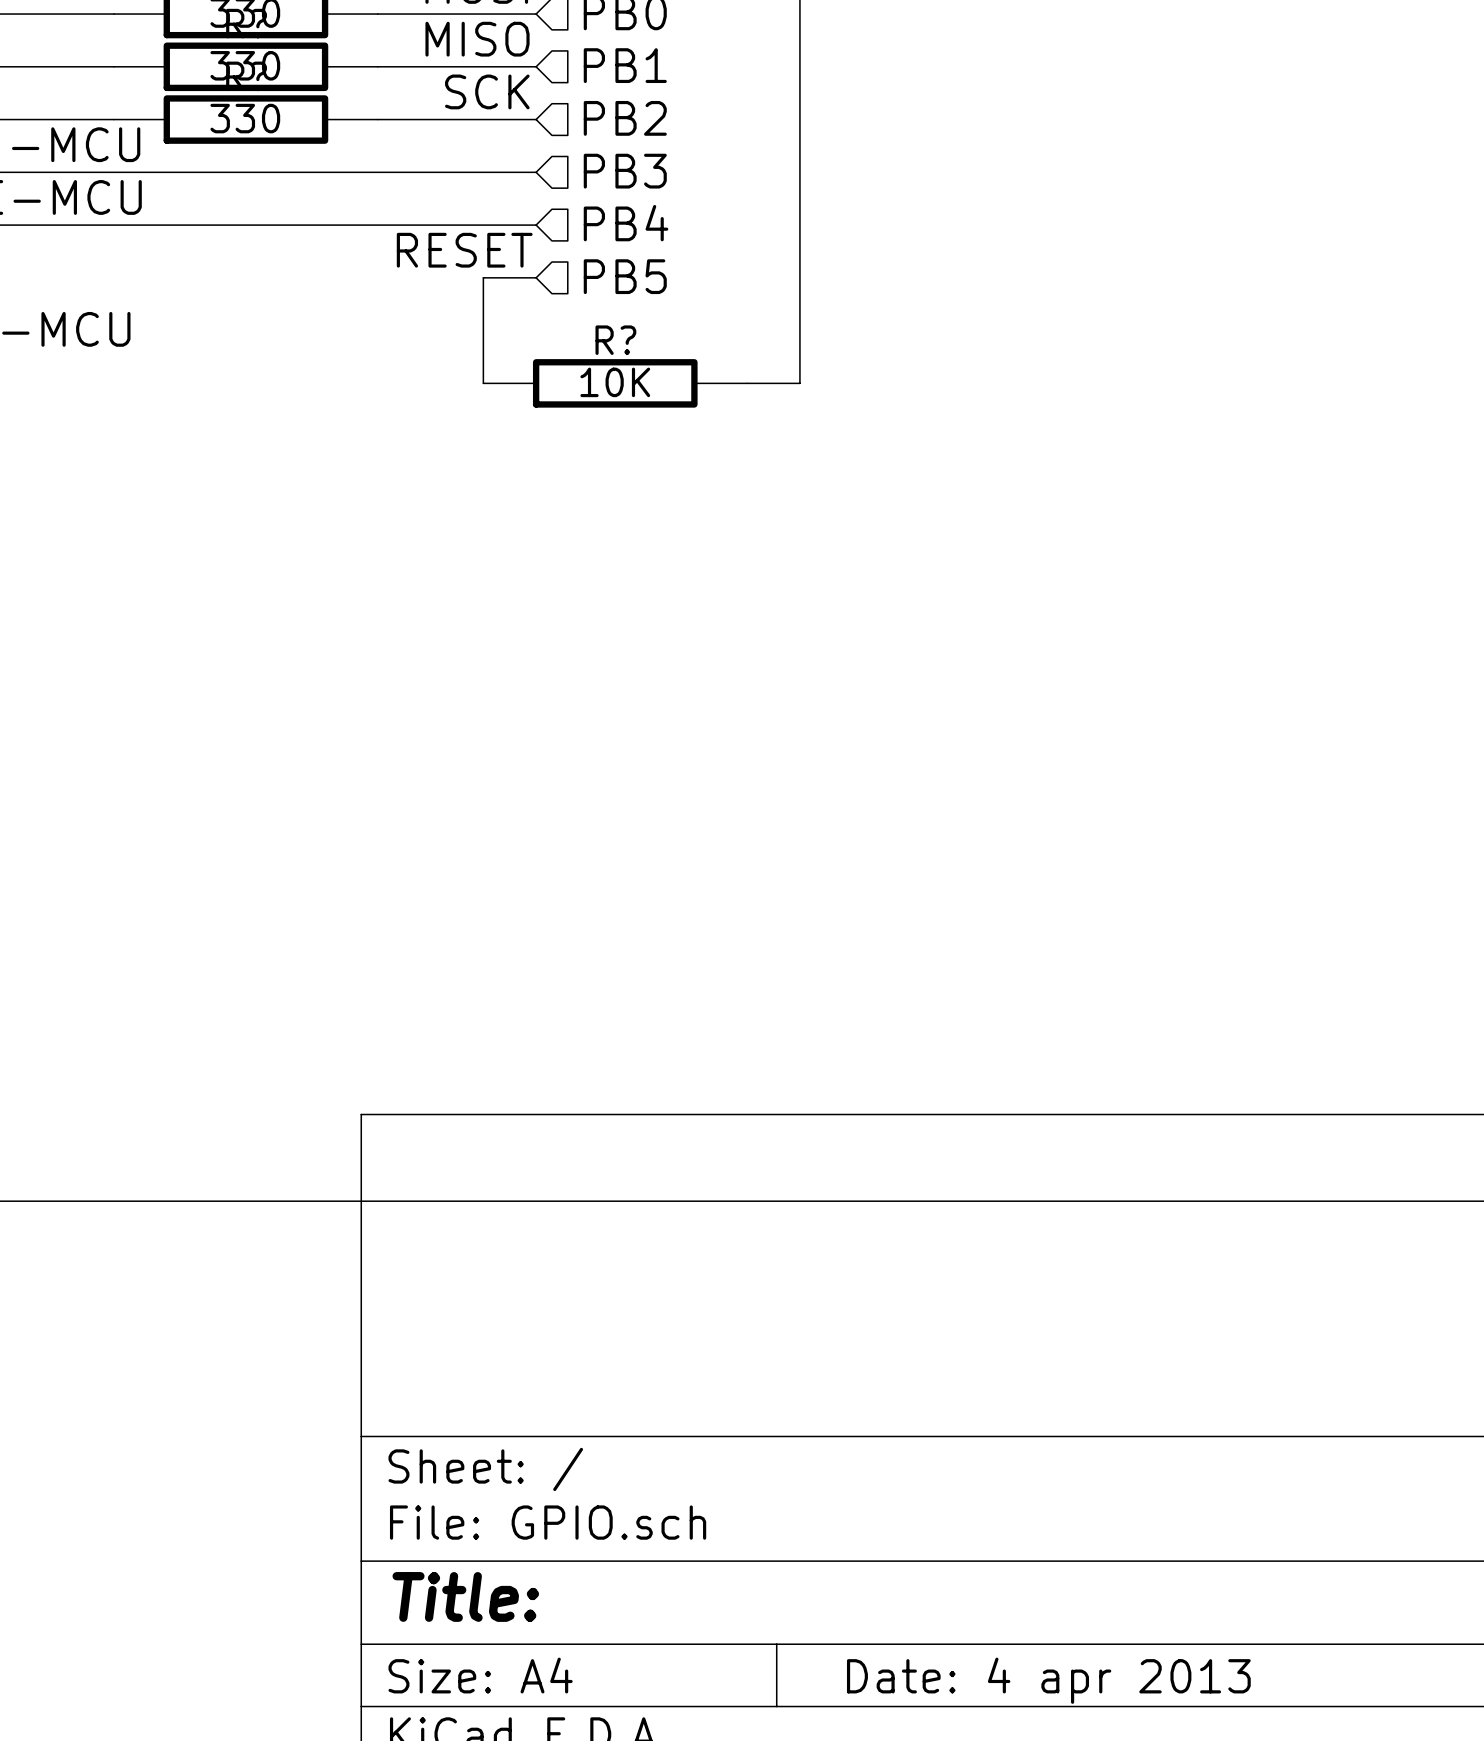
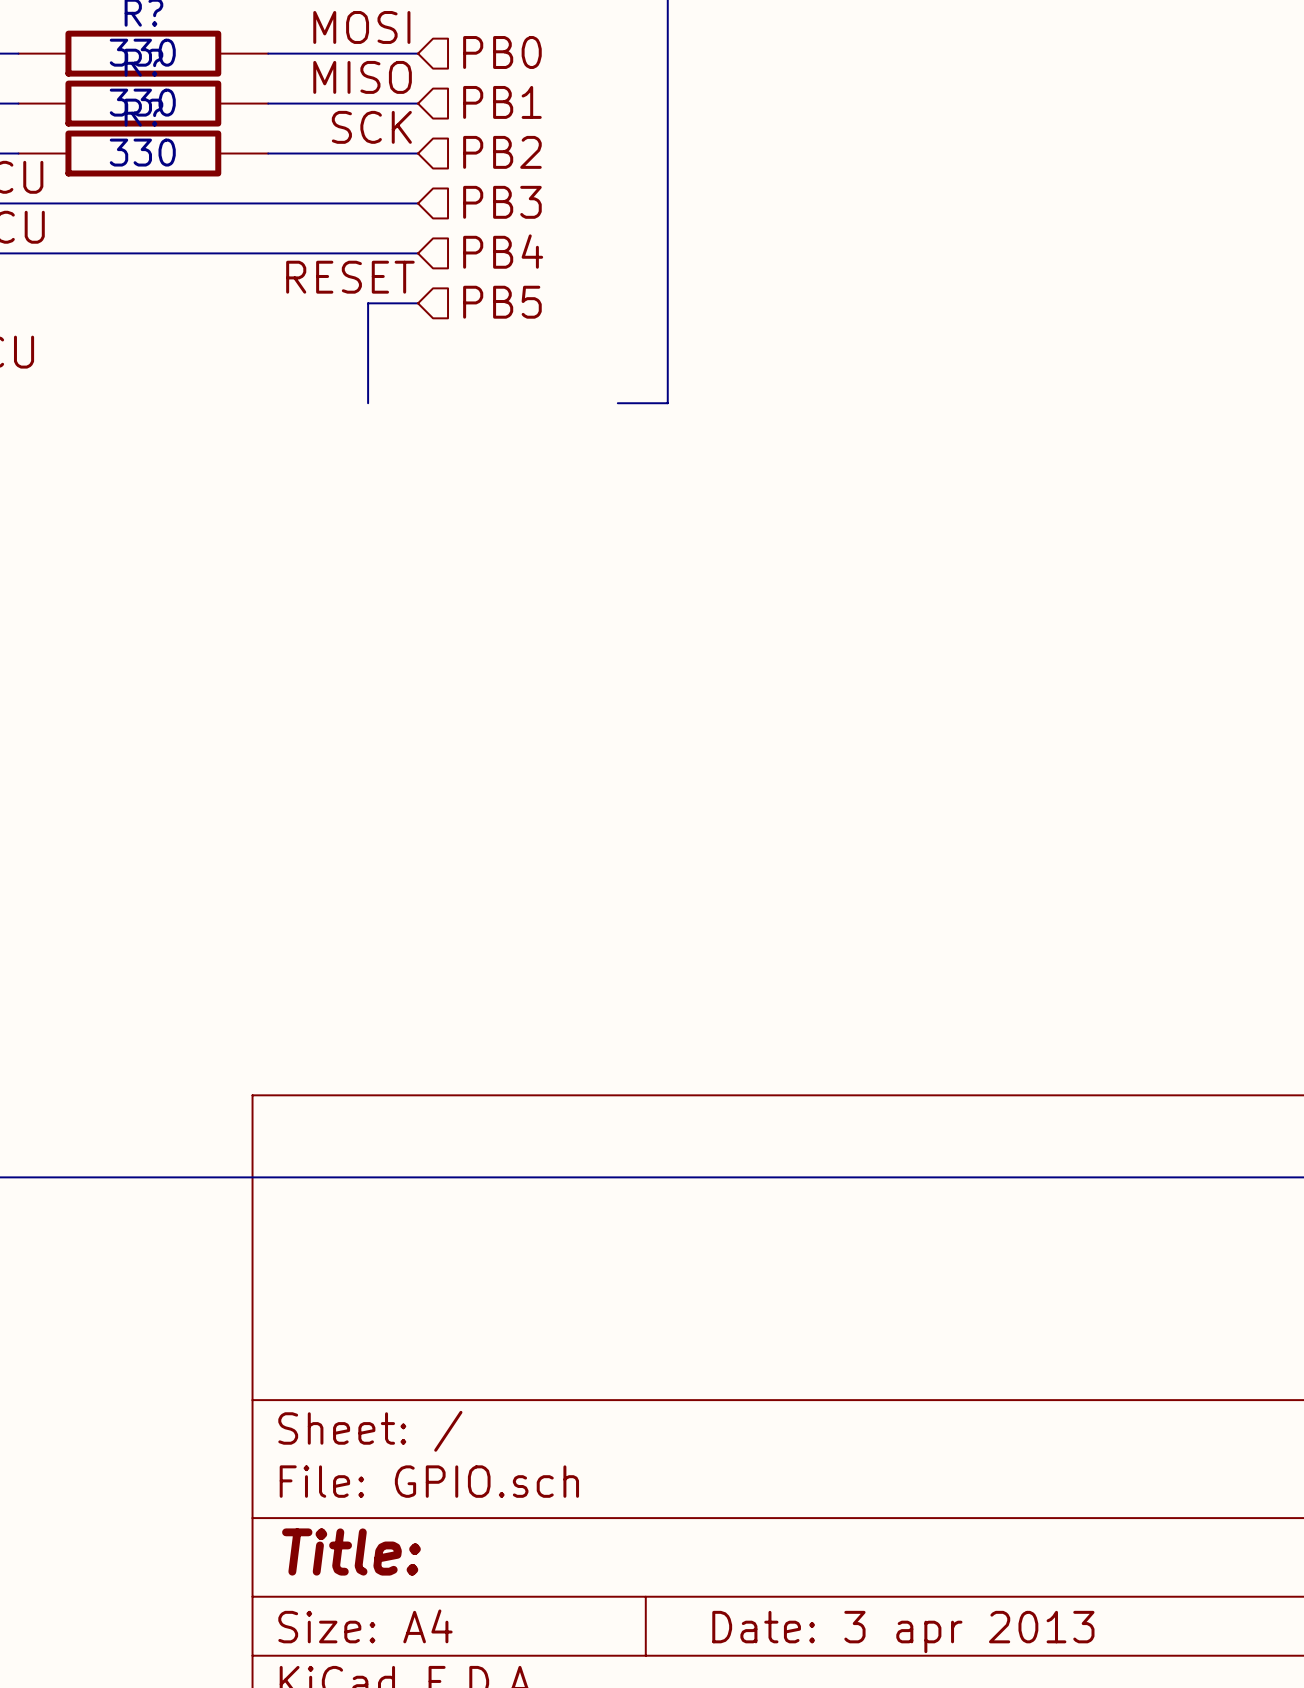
R?: 10K (615, 383) -> none
title block: Date: 4 apr 2013 (1048, 1680) -> Date: 3 apr 2013 (903, 1632)

